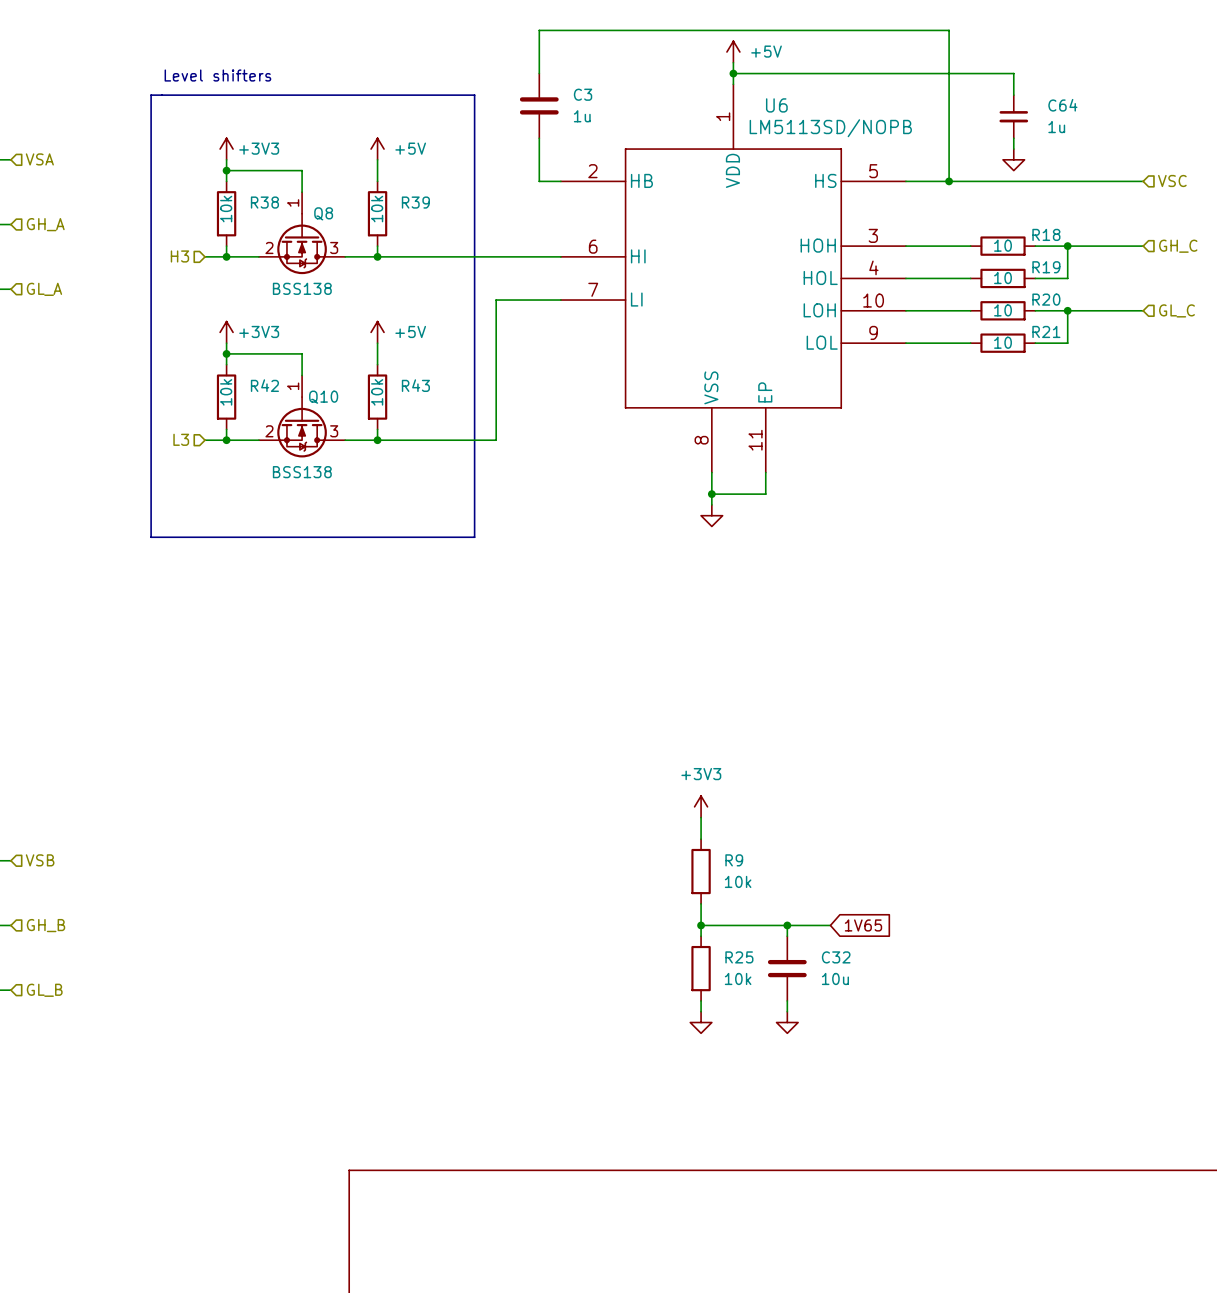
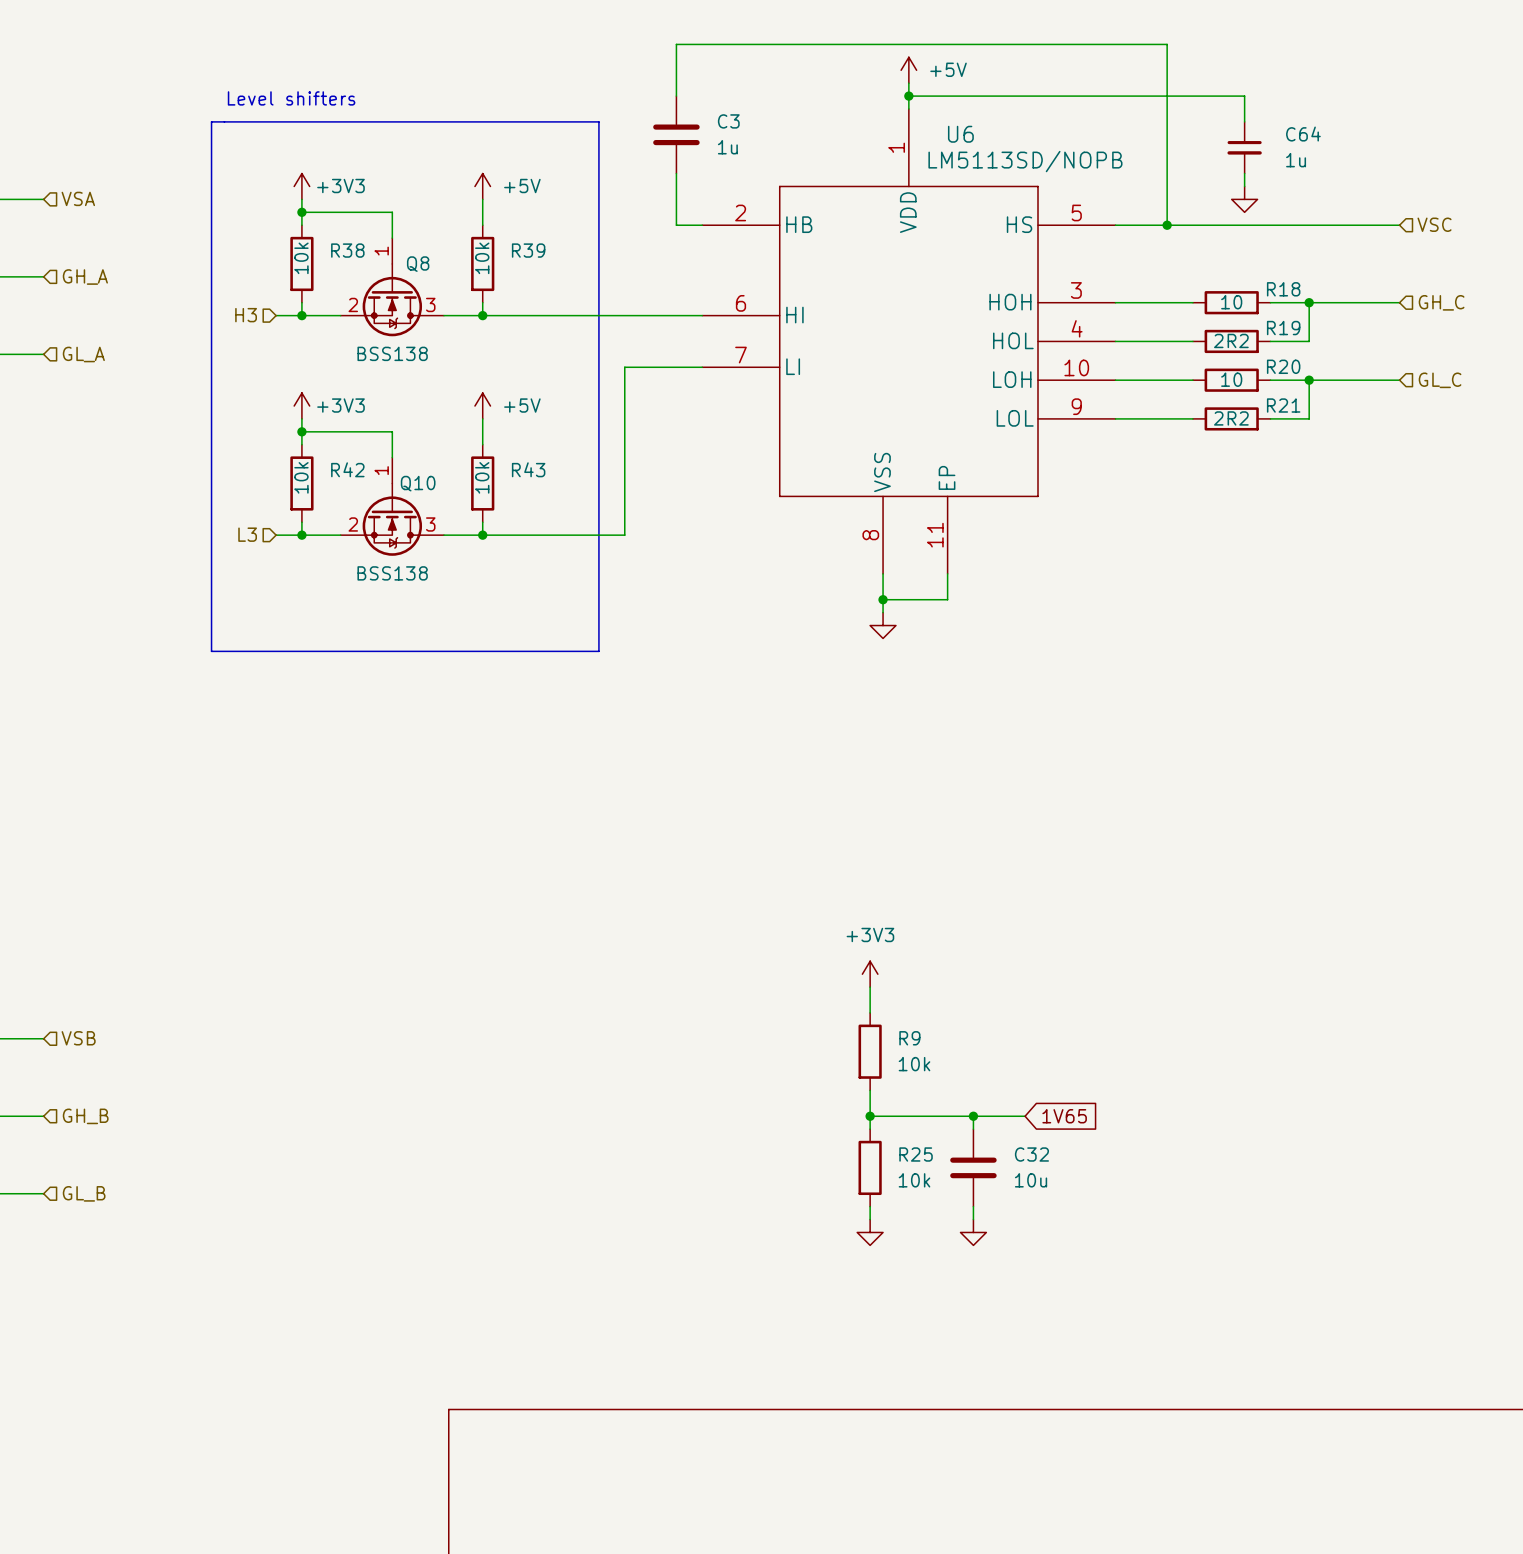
R19 value: 10 (1003, 278) -> 2R2 (1231, 340)
R21 value: 10 (1003, 342) -> 2R2 (1231, 418)

